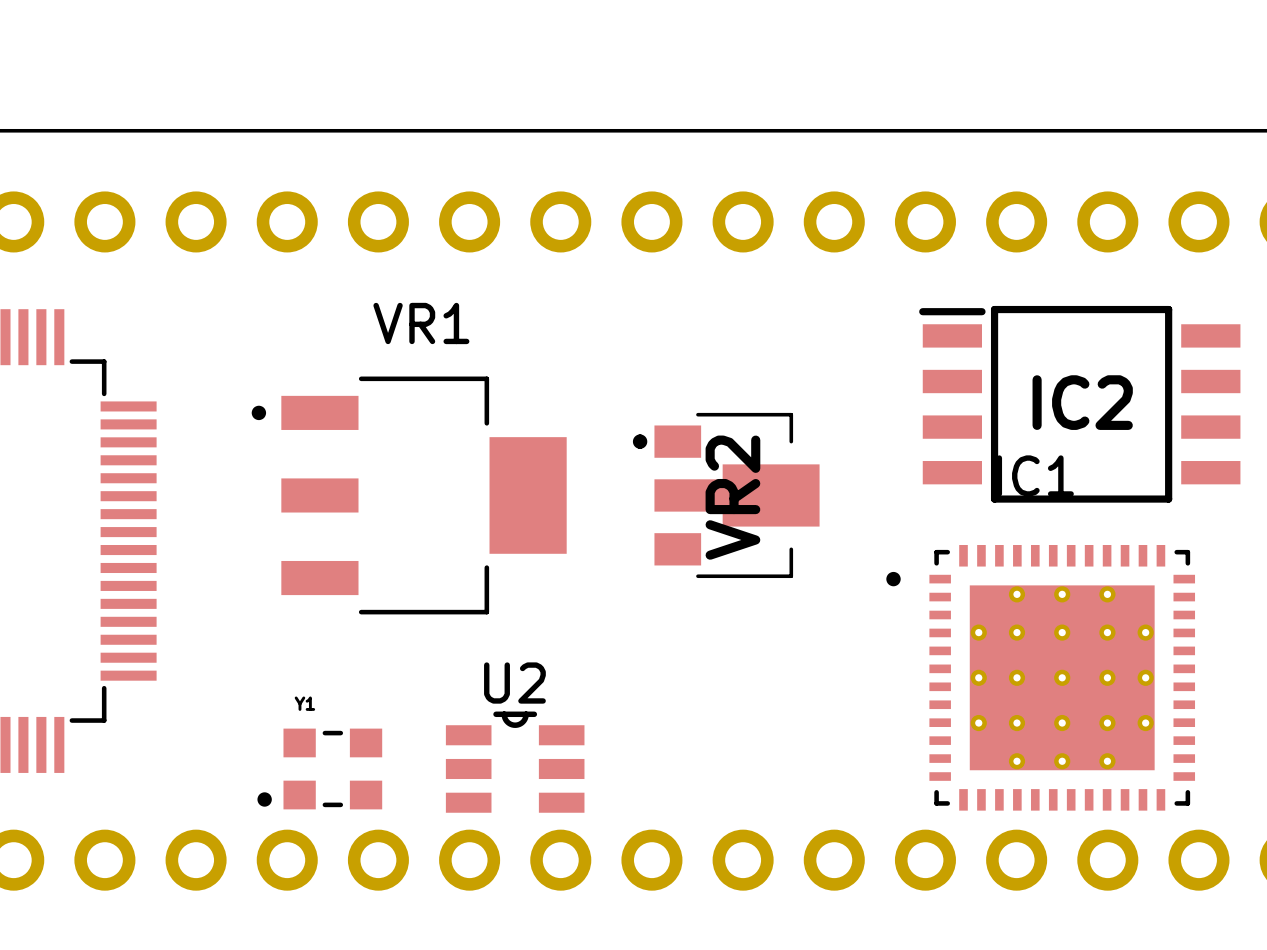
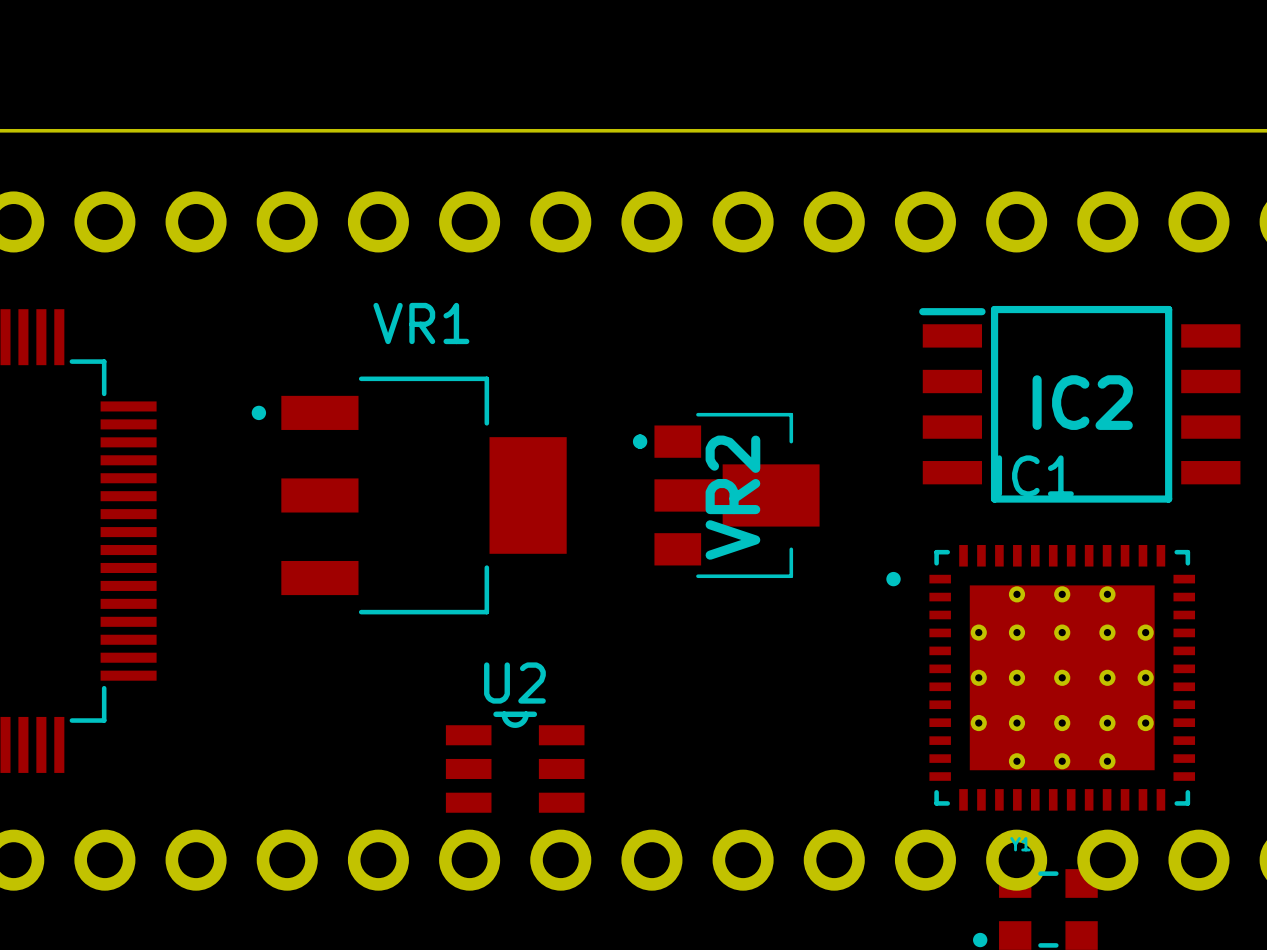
Y1 position: (319, 768) -> (1035, 909)

